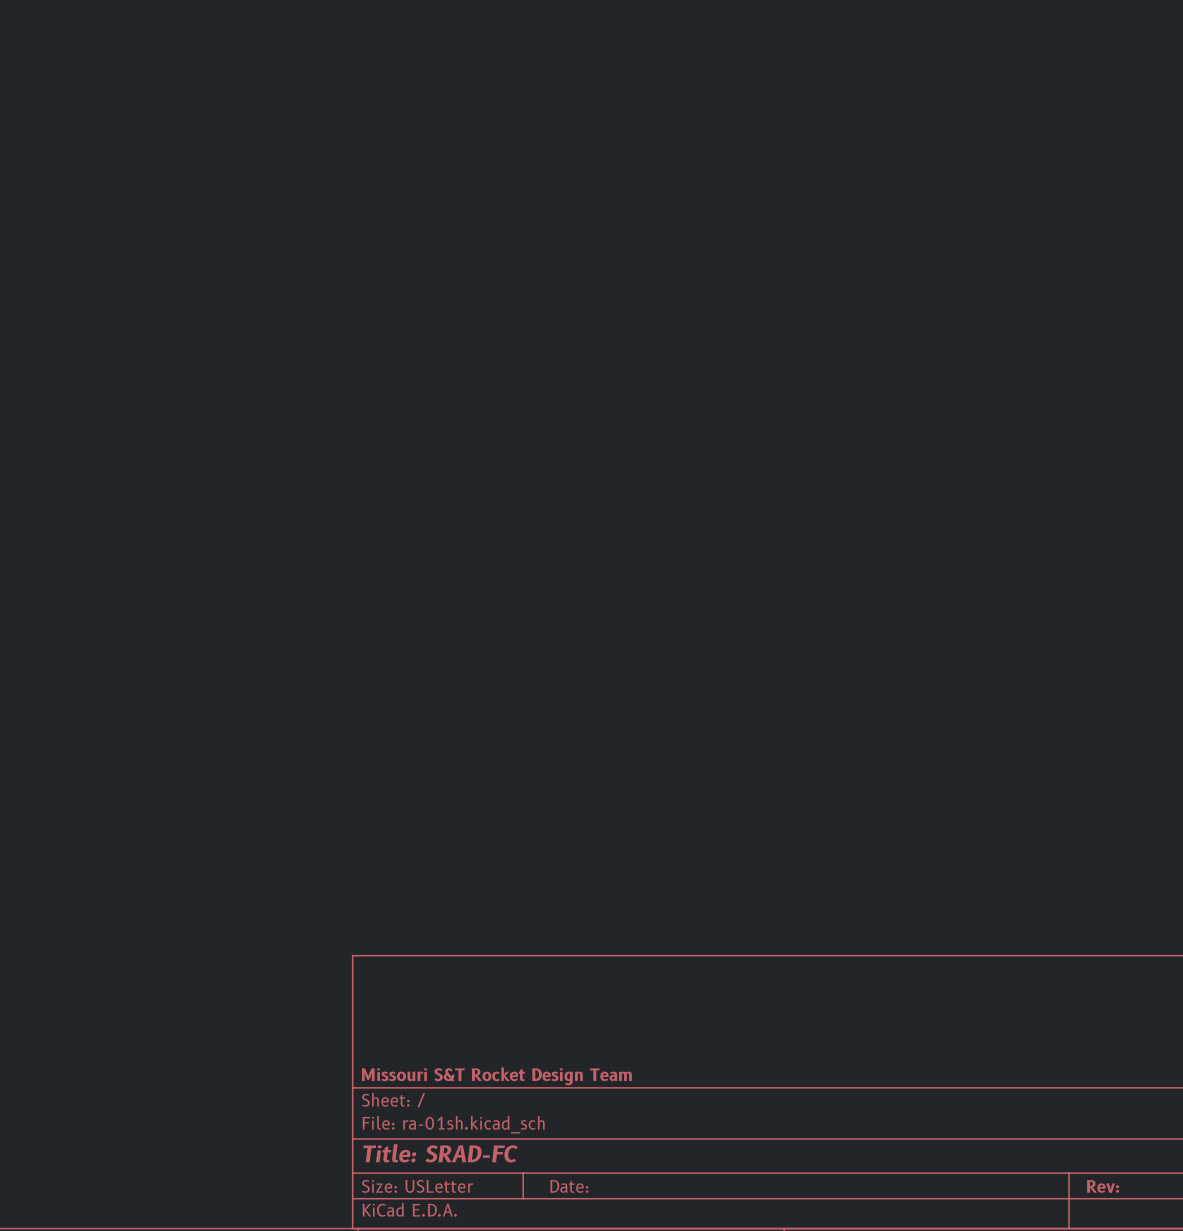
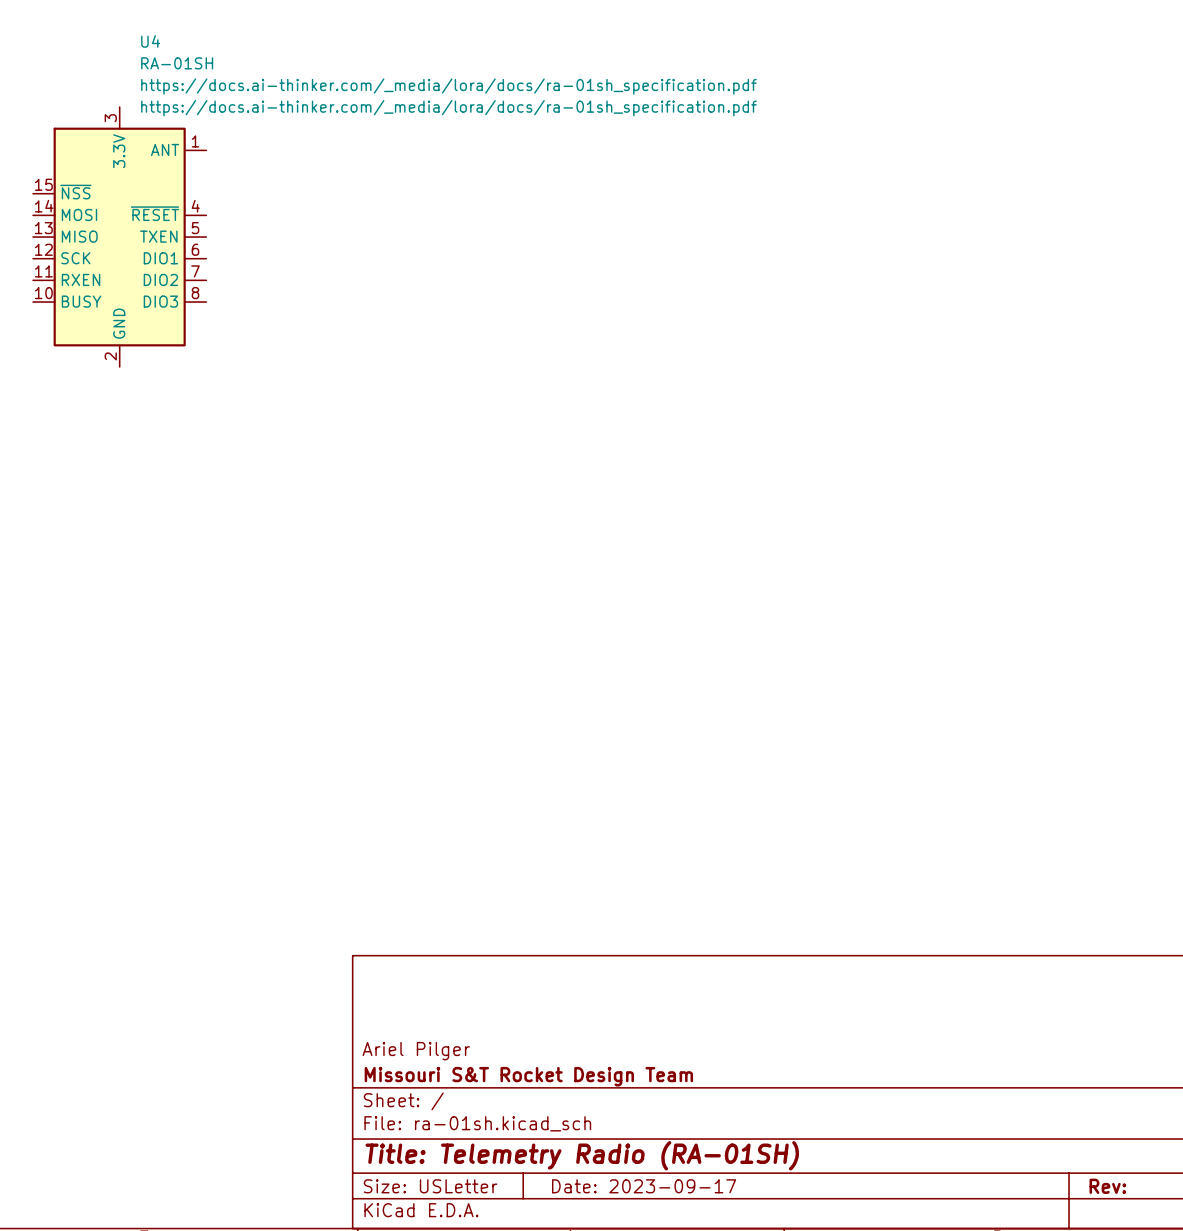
U4: none -> RA-01SH (119, 237)
title block: none -> Ariel Pilger (416, 1051)
title block: Title: SRAD-FC (440, 1153) -> Title: Telemetry Radio (RA-01SH) (582, 1155)
title block: Date: (569, 1186) -> Date: 2023-09-17 (644, 1186)

